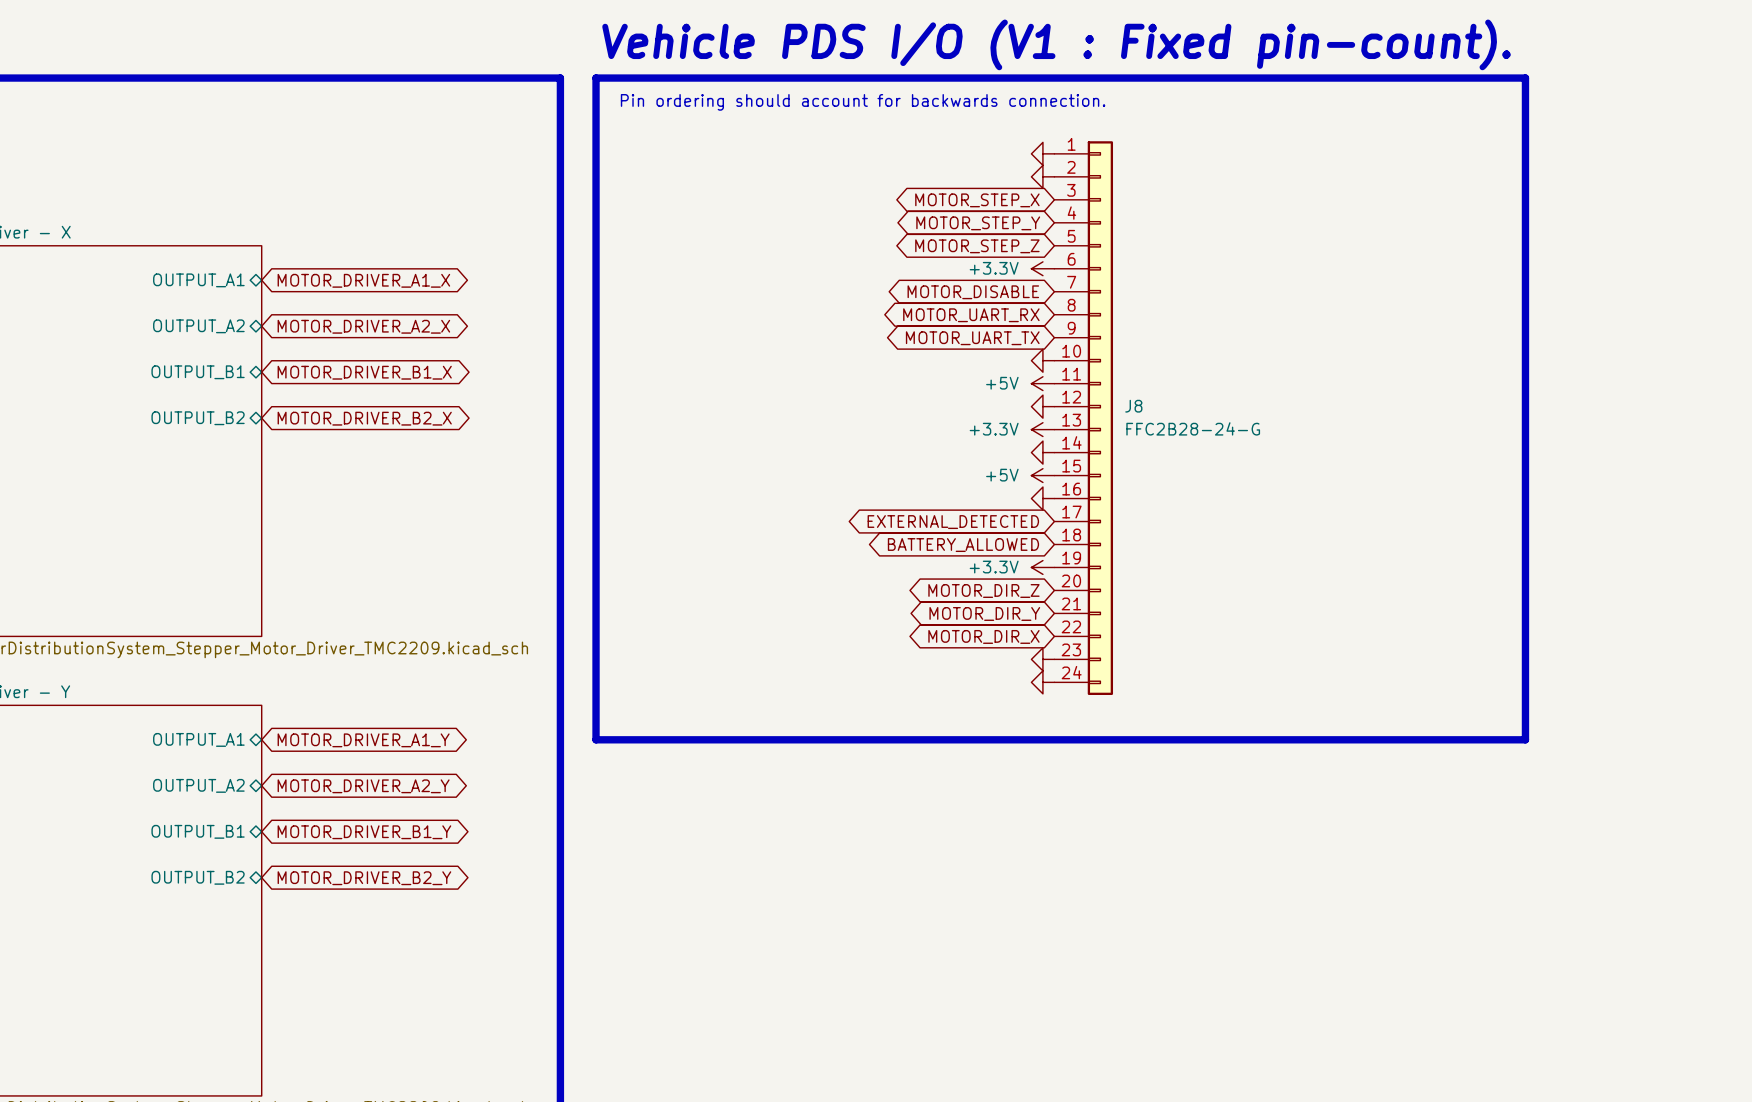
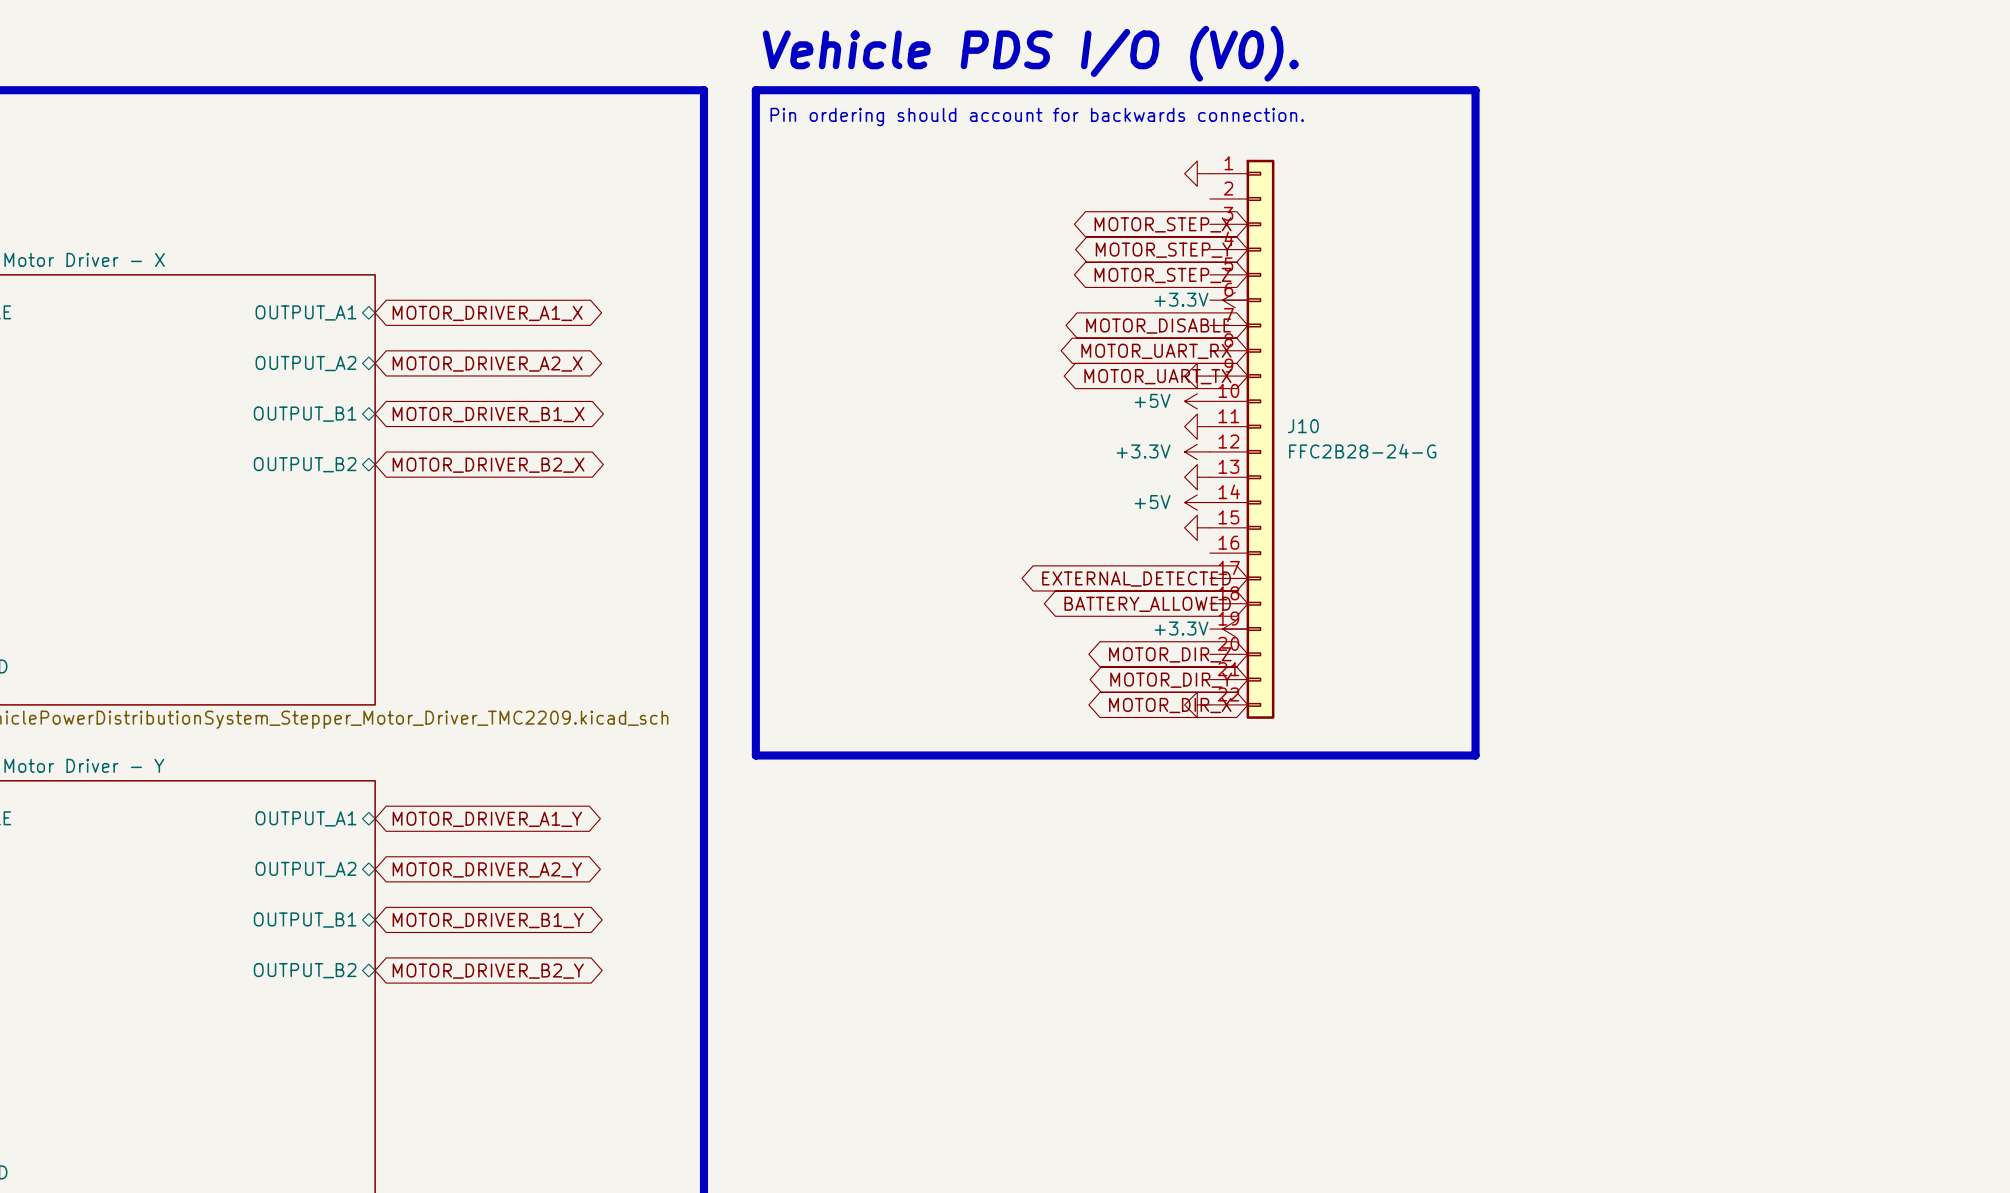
text: Vehicle PDS I/O (V1 : Fixed pin-count). (1056, 44) -> Vehicle PDS I/O (V0). (1030, 53)
line: (607, 78) (596, 78) (596, 739) (1525, 739) (1525, 78) (1261, 78) -> (755, 90) (755, 755) (1475, 755) (1475, 90)
power symbol: none -> (1197, 173)
power symbol: (1042, 153) -> none
power symbol: (1042, 176) -> none
power symbol: none -> (1197, 376)
power symbol: none -> +5V (1197, 401)
power symbol: (1042, 360) -> none
power symbol: none -> (1197, 426)
power symbol: +5V (1042, 383) -> none
J10: none -> FFC2B28-24-G (1242, 439)
power symbol: (1042, 406) -> none
J8: FFC2B28-24-G (1083, 418) -> none
power symbol: none -> (1197, 477)
power symbol position: +3.3V (1042, 429) -> +3.3V (1197, 451)
power symbol: none -> +5V (1197, 502)
power symbol: (1042, 452) -> none
power symbol: none -> (1197, 527)
power symbol: +5V (1042, 475) -> none
power symbol: (1042, 498) -> none
power symbol: none -> (1197, 704)
power symbol: (1042, 659) -> none
power symbol: (1042, 682) -> none

